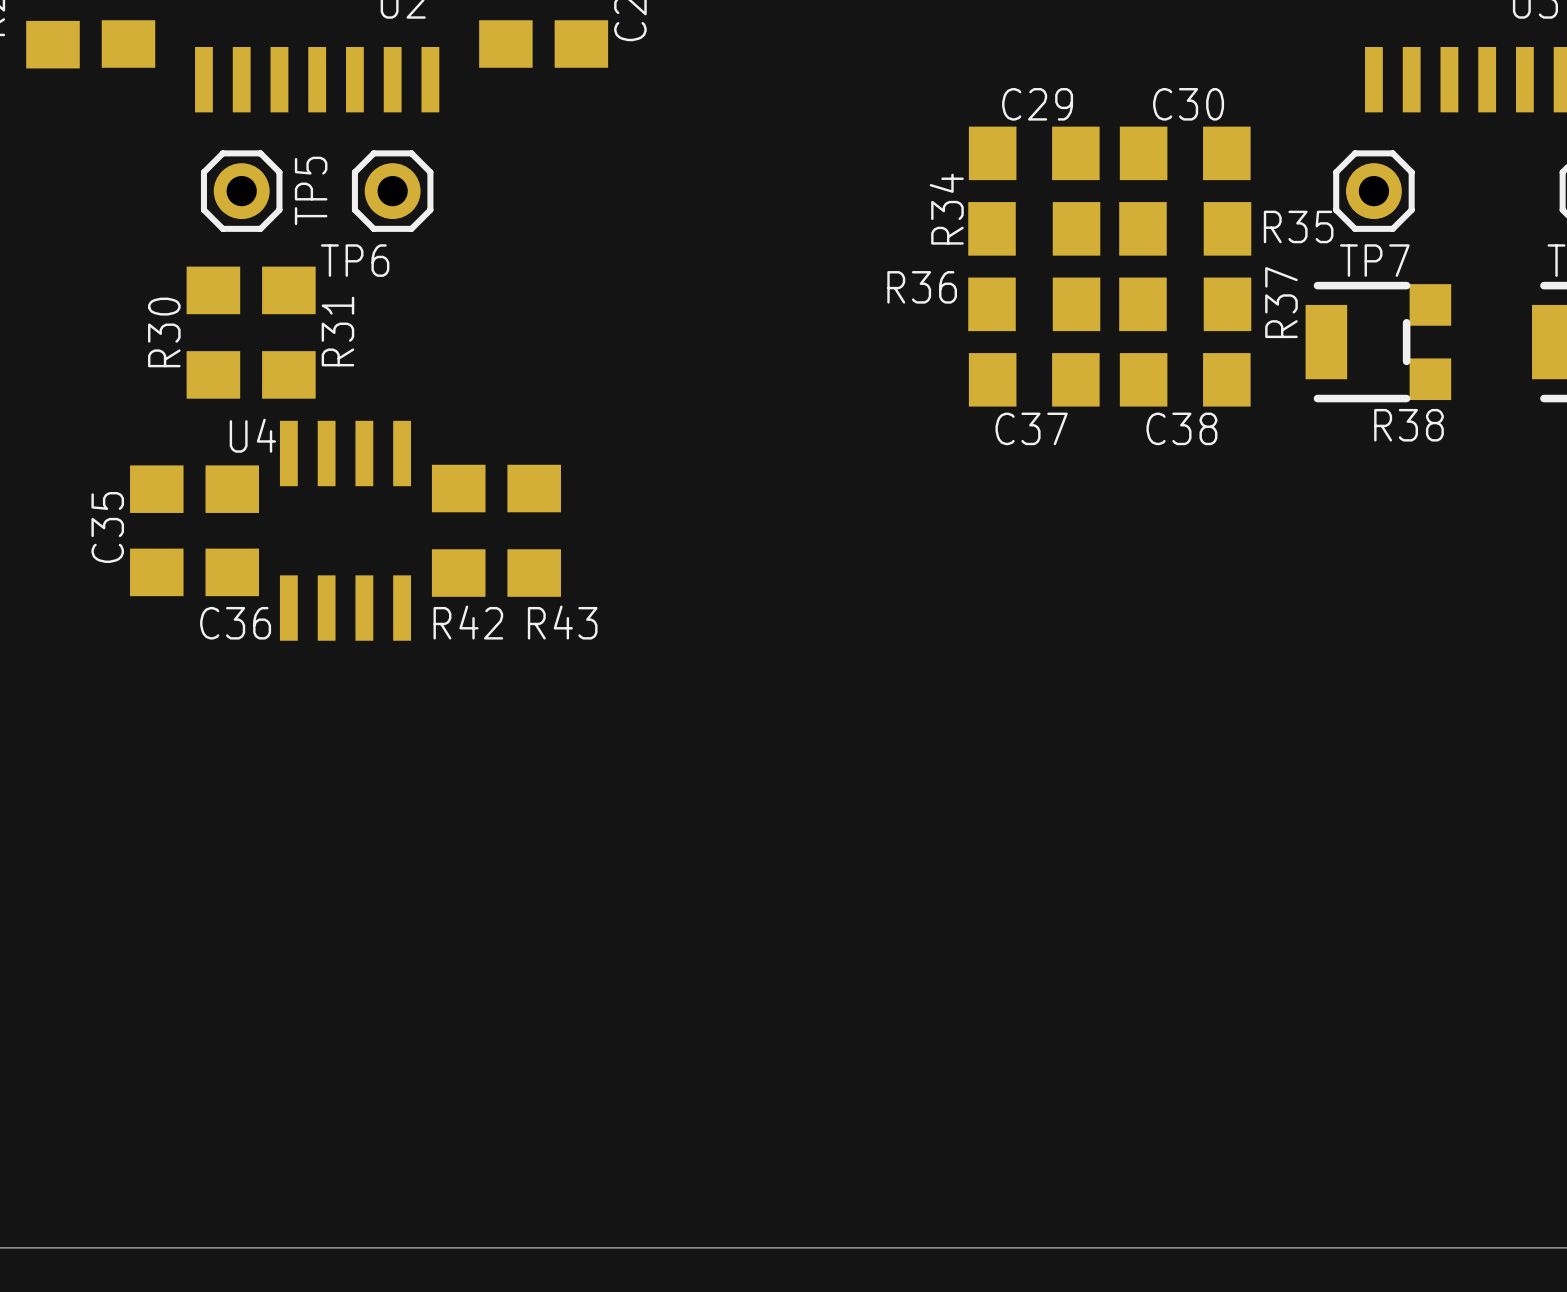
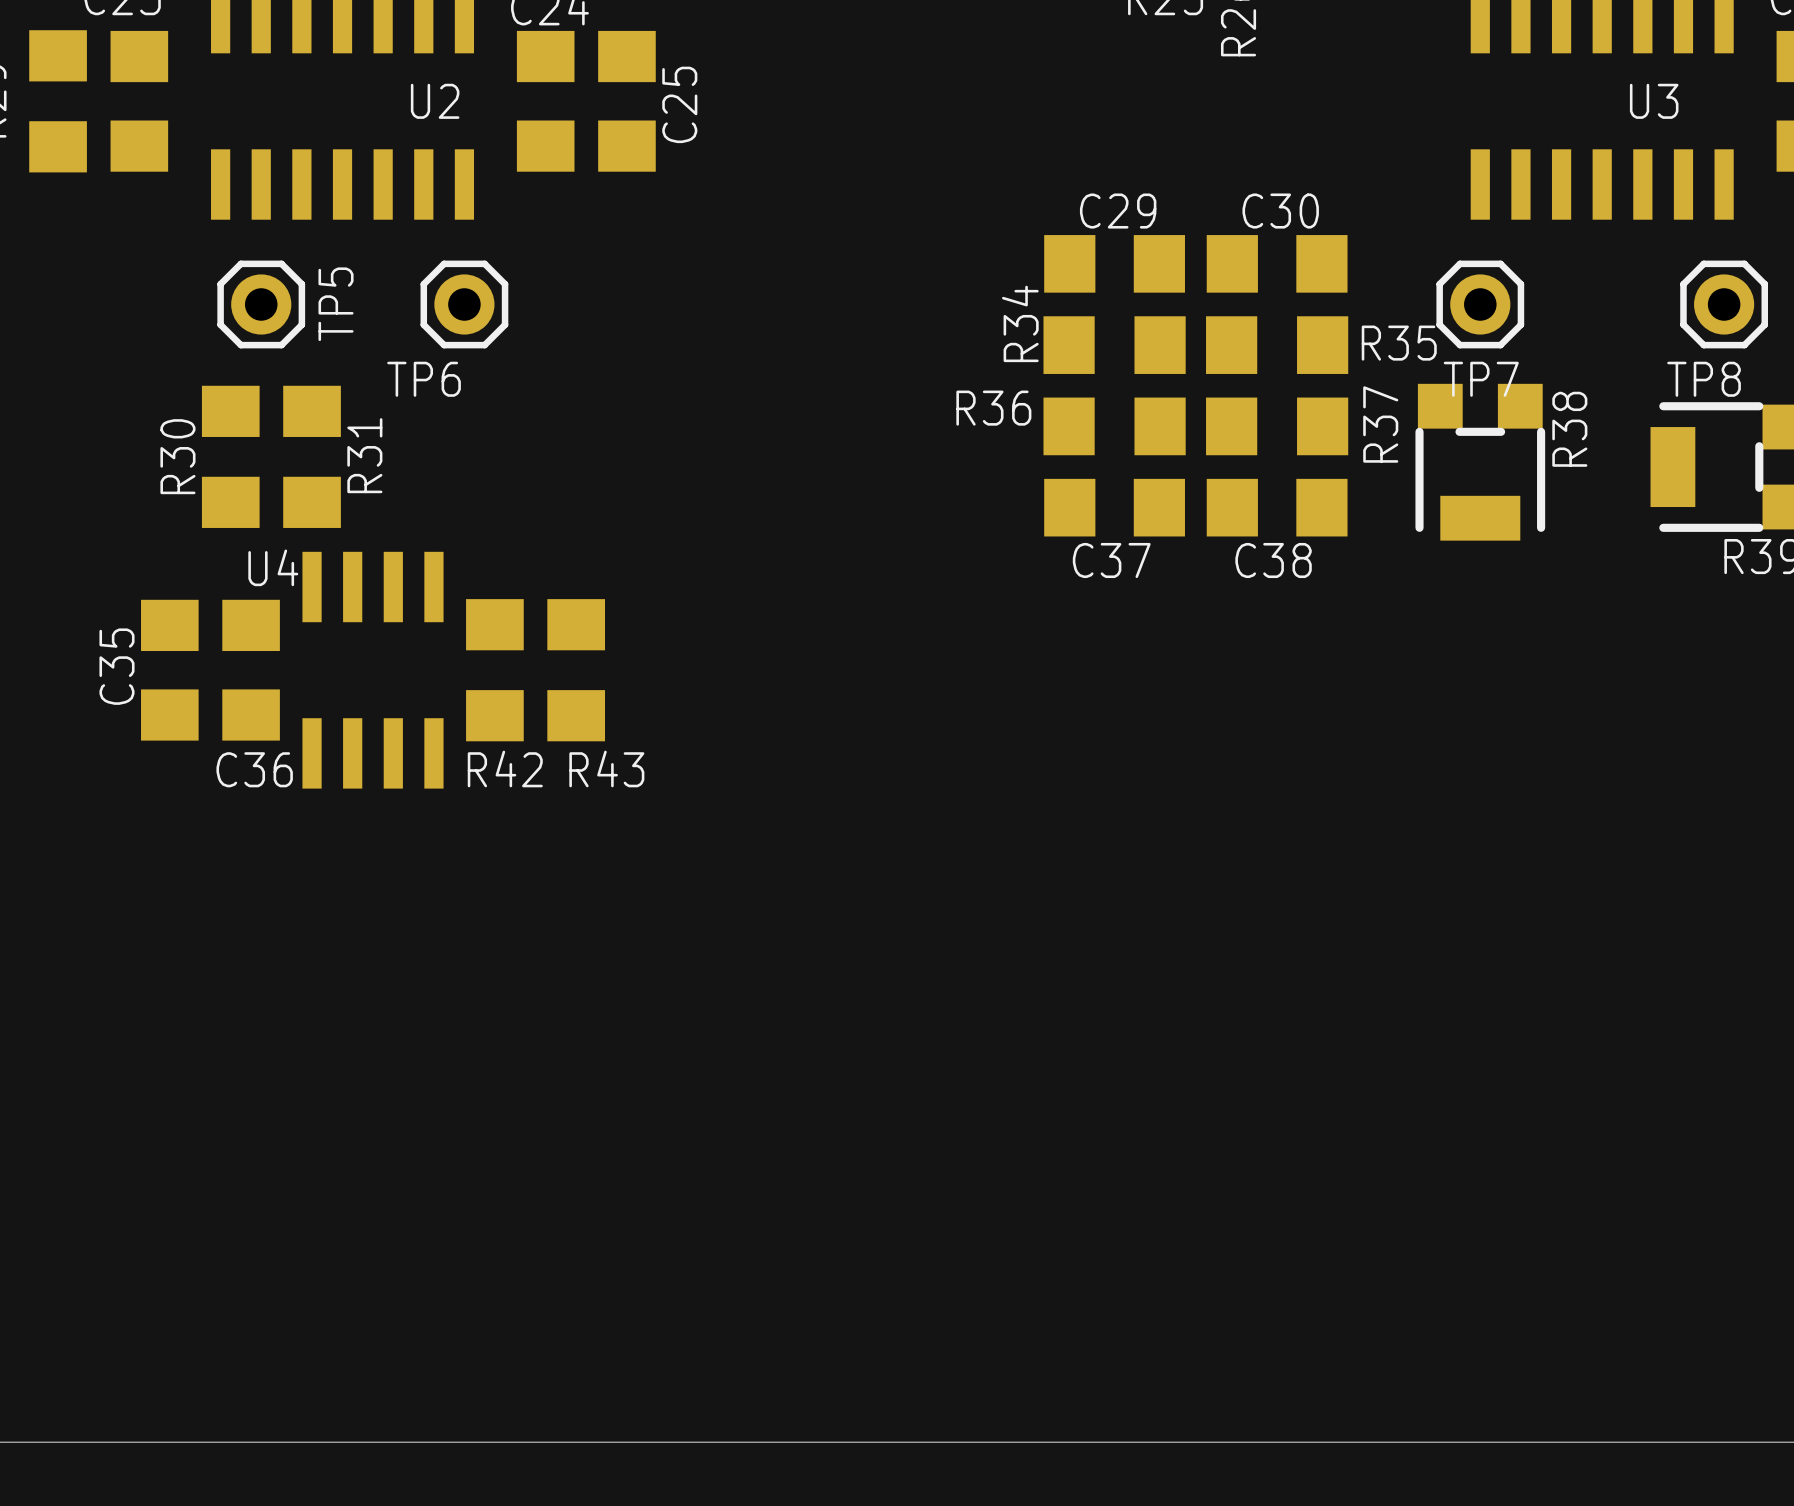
TP6 position: (392, 191) -> (464, 304)
R38 rotation: 0° (1378, 342) -> 90° counterclockwise (1480, 462)

